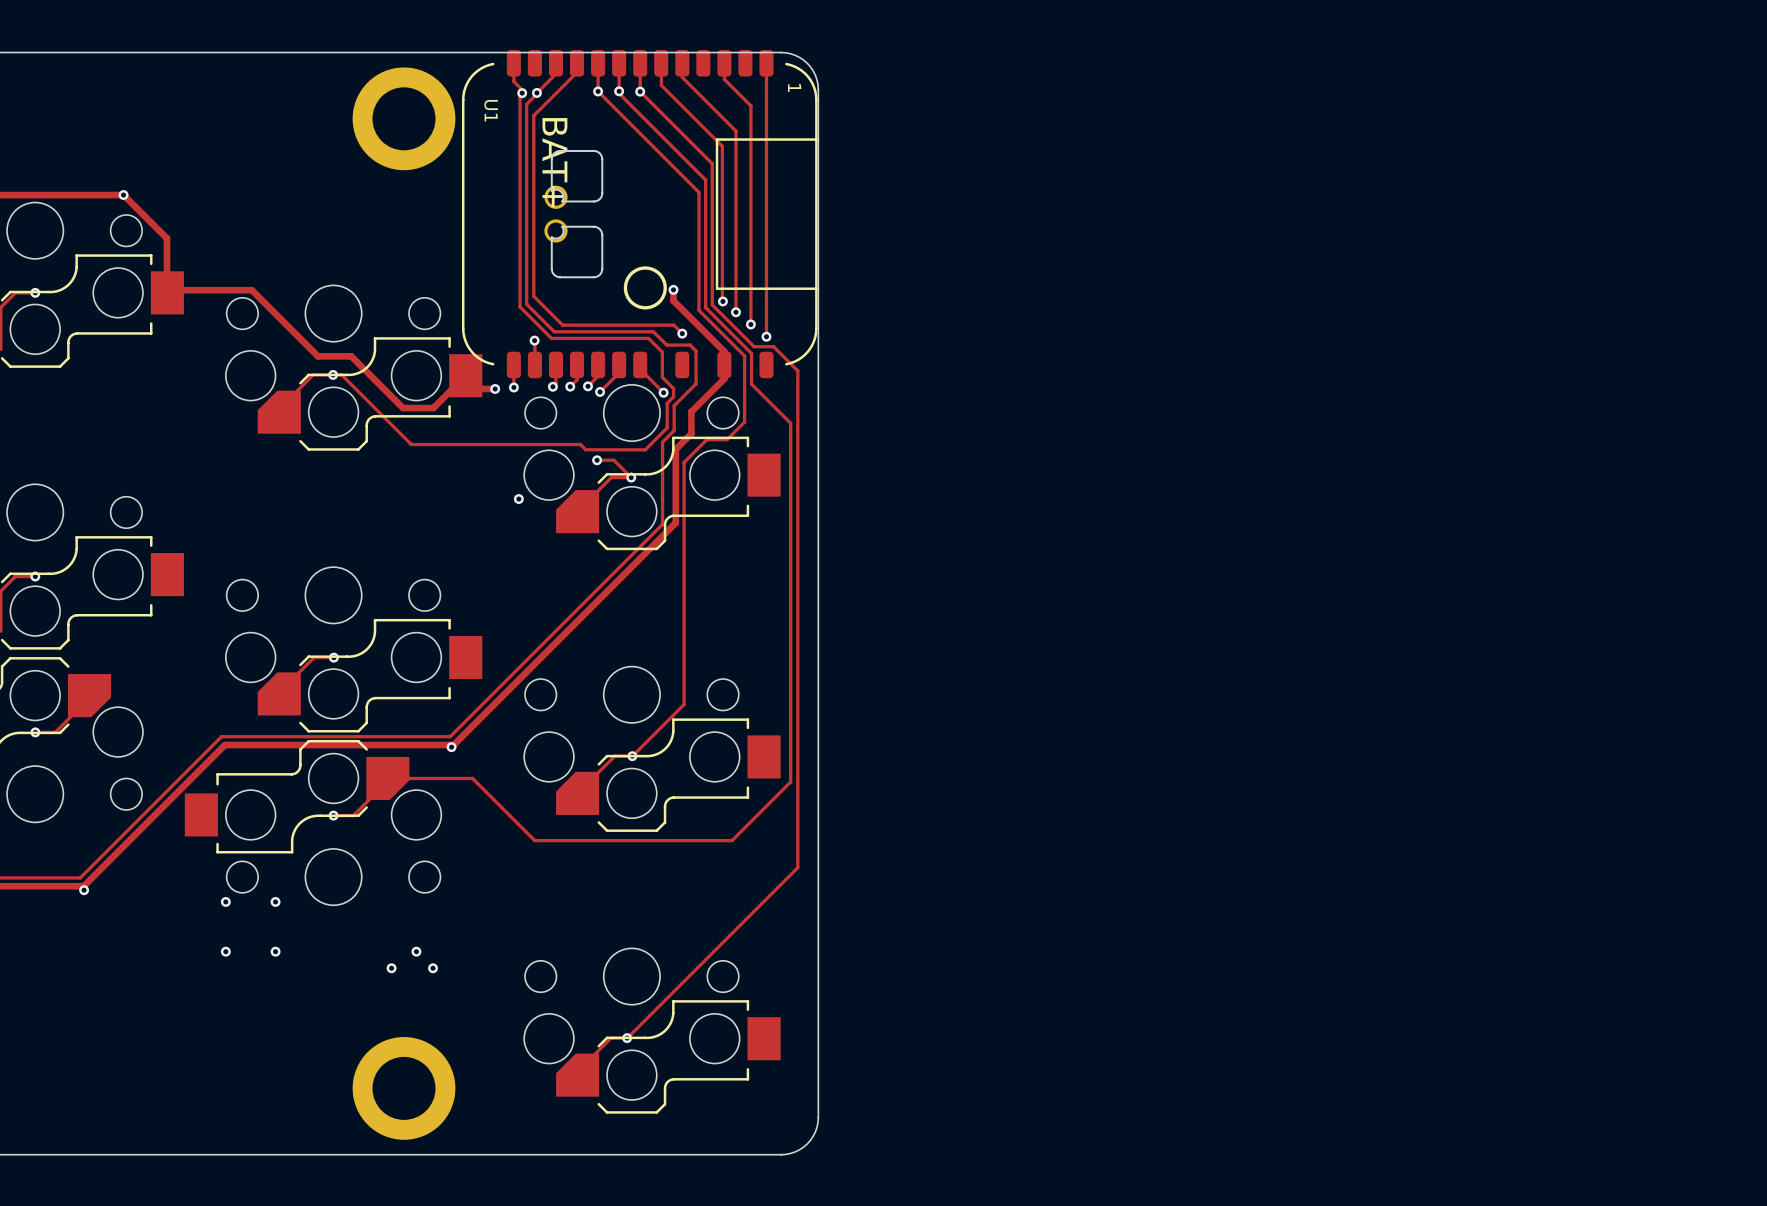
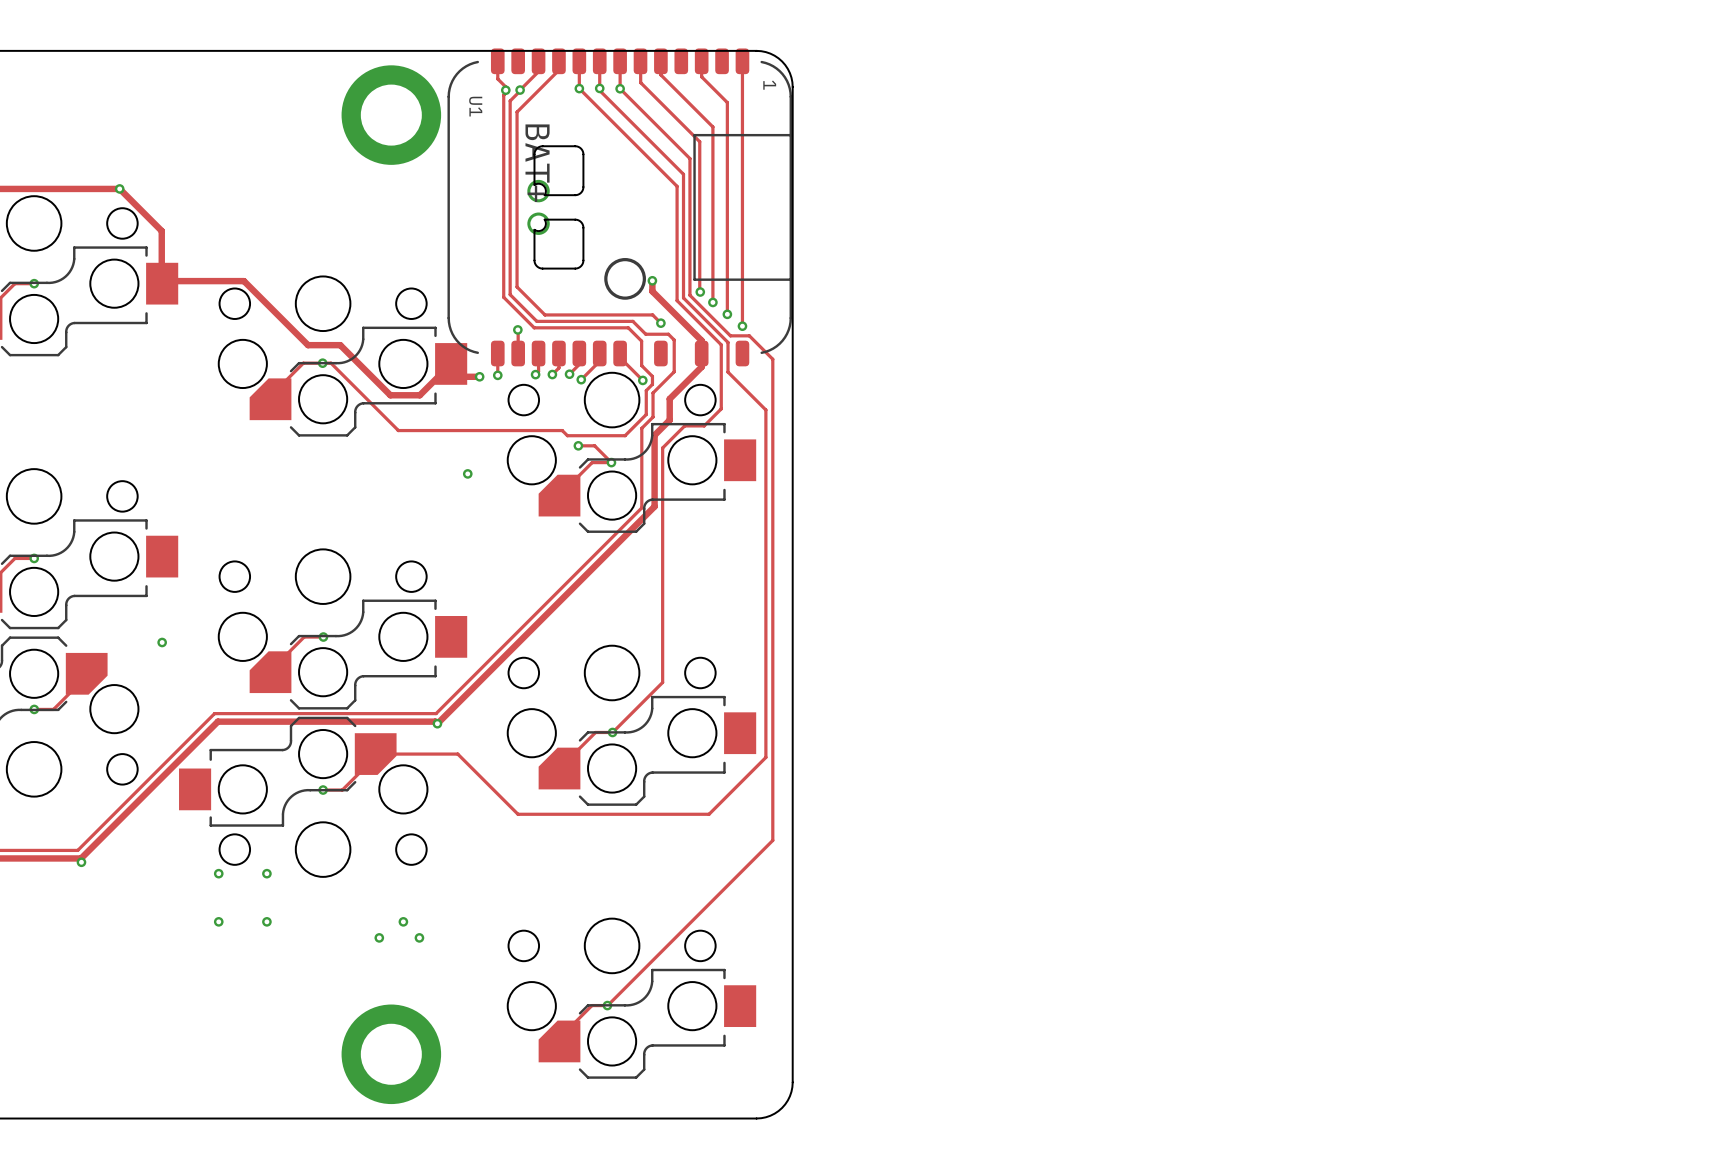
via position: (518, 499) -> (467, 473)
via: none -> (162, 642)

